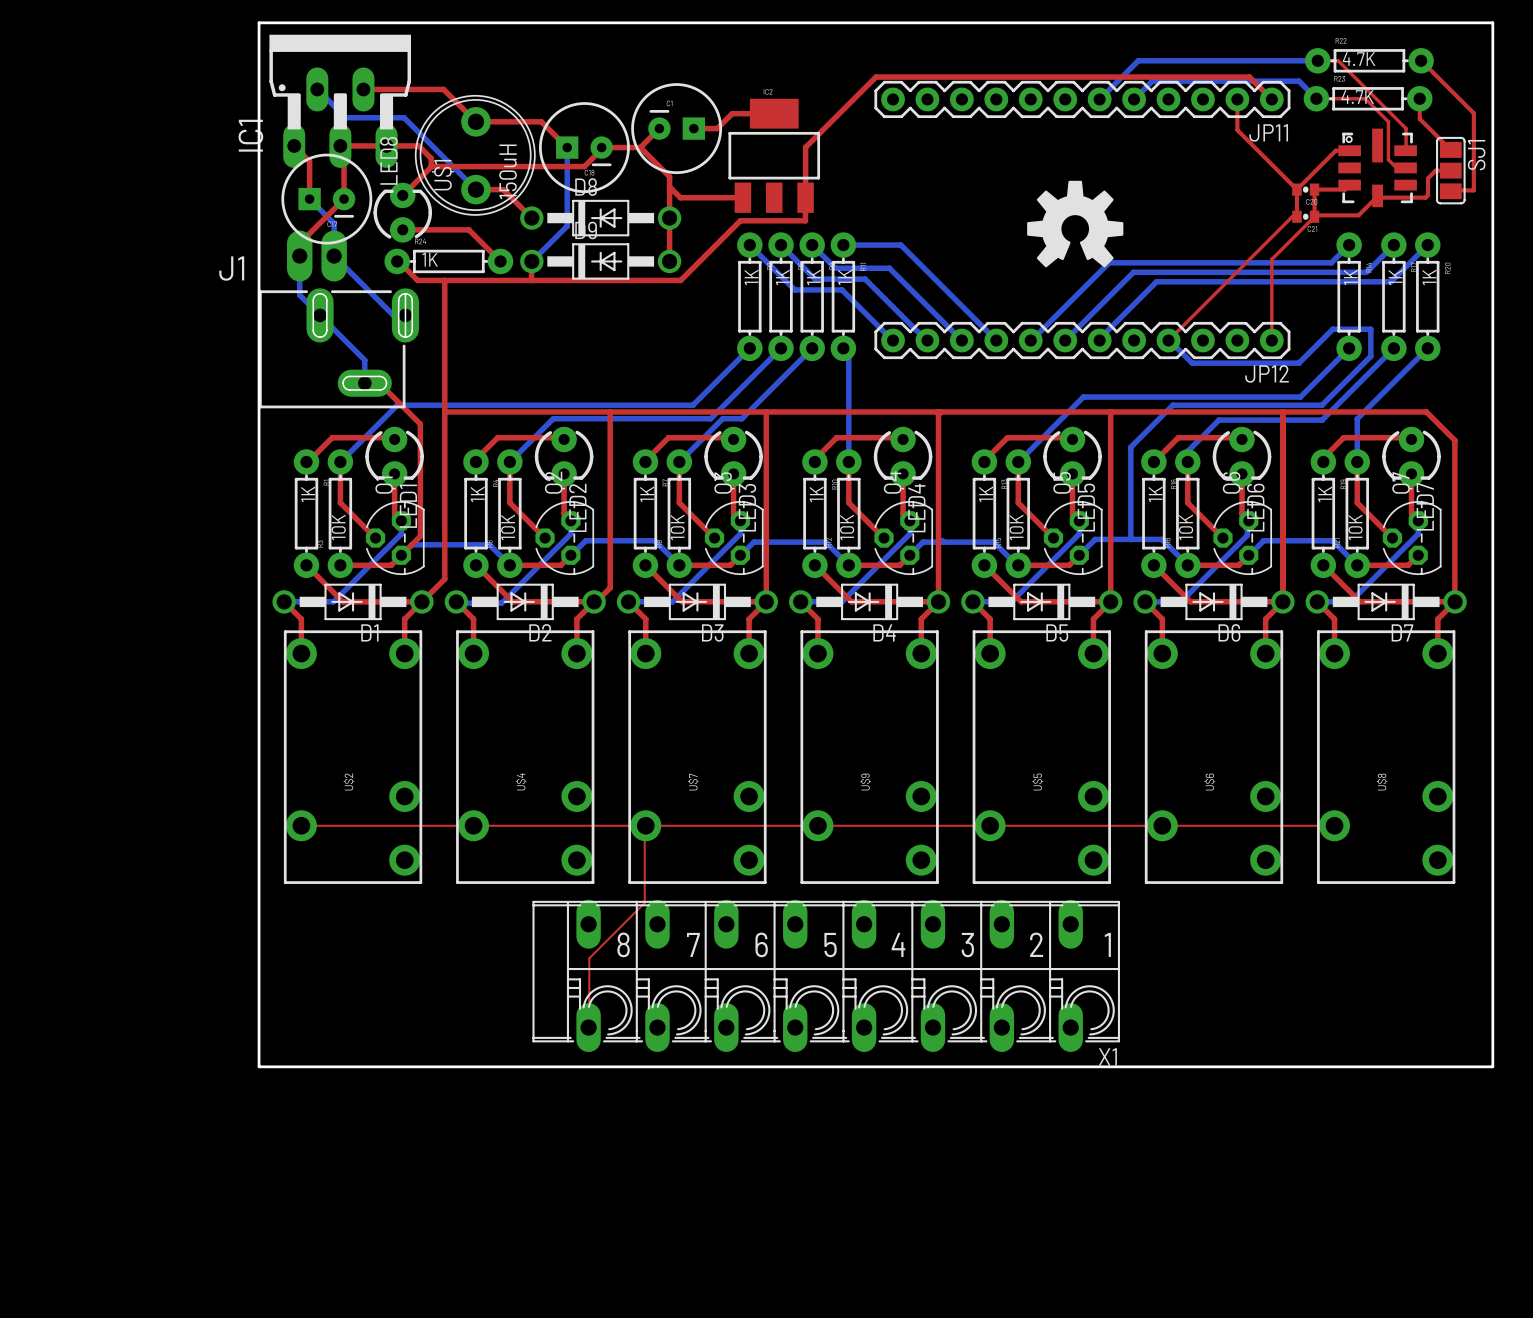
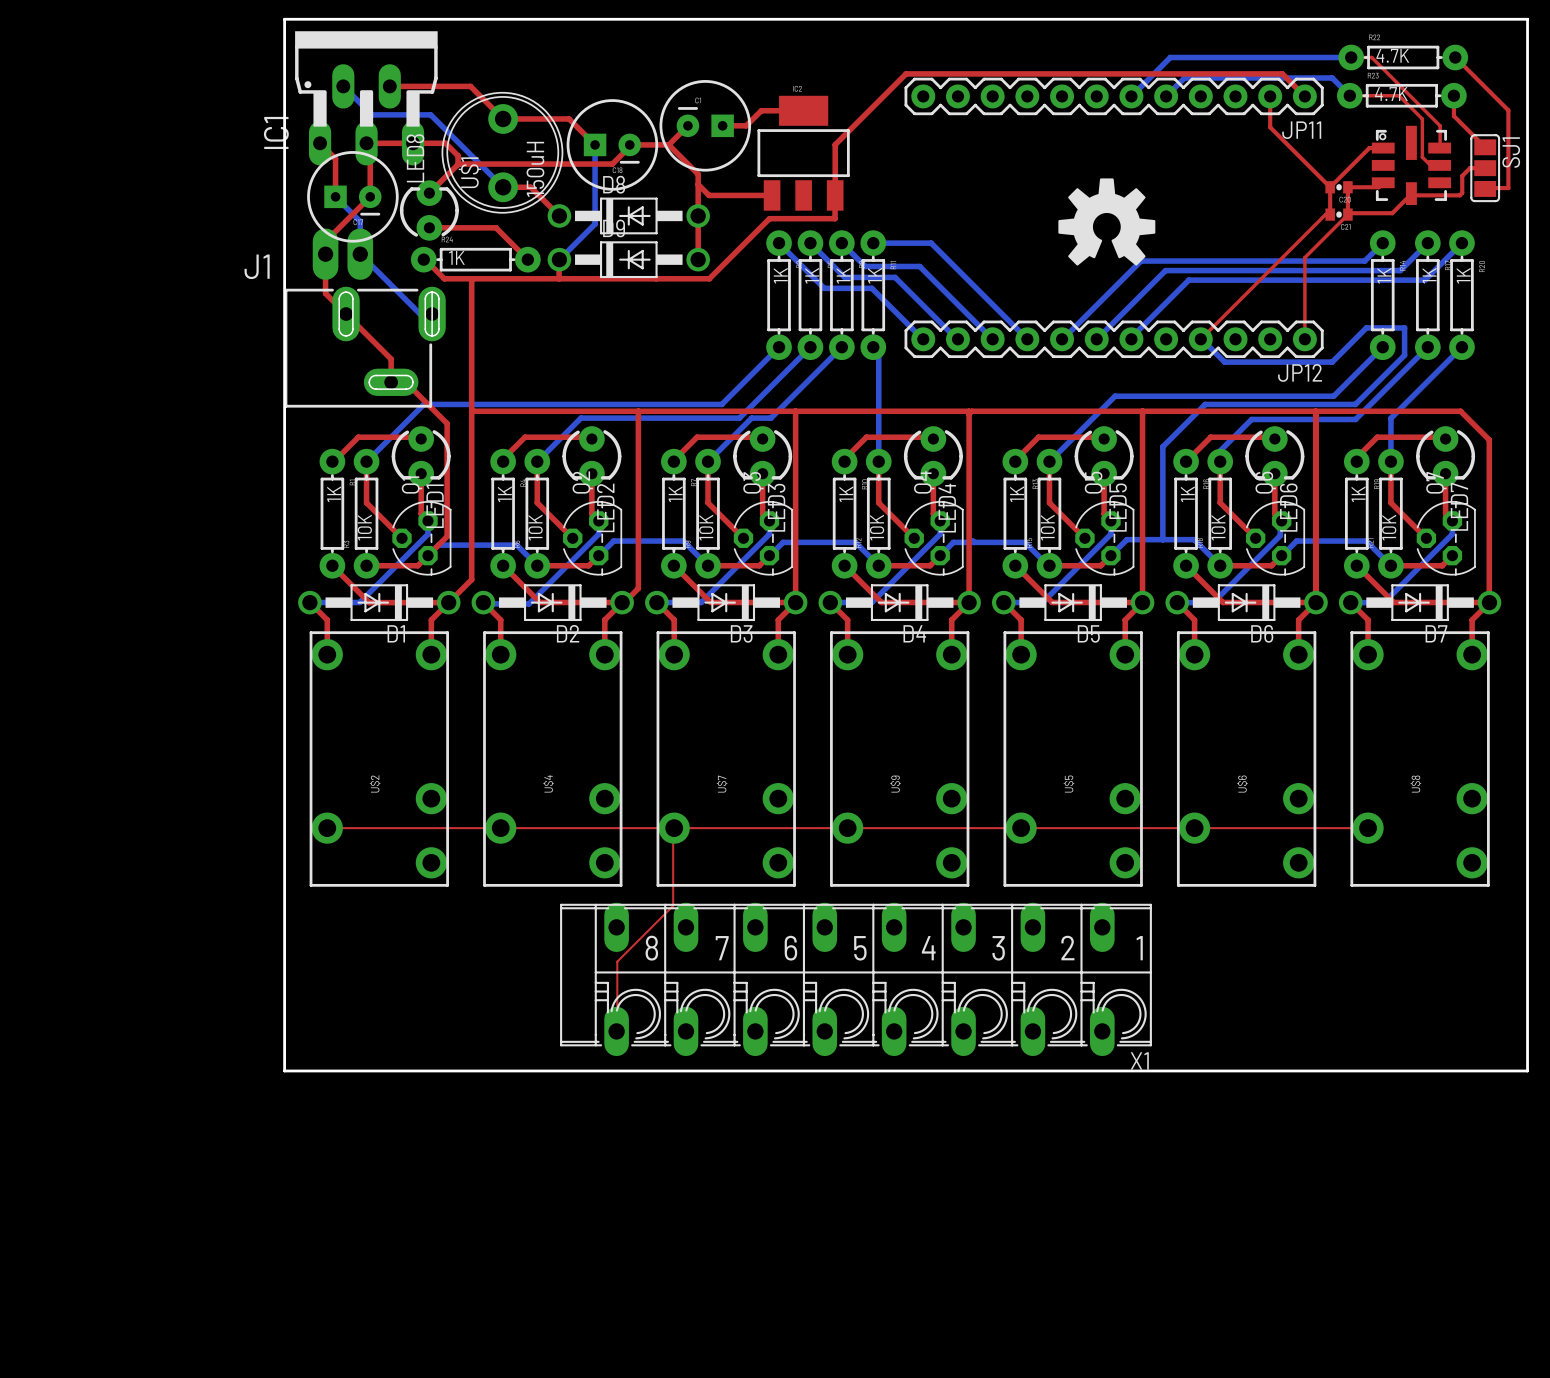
top track: none -> (325, 254) (325, 293) (391, 359) (391, 382)
bottom track: (299, 256) (299, 295) (364, 360) (364, 383) -> none

